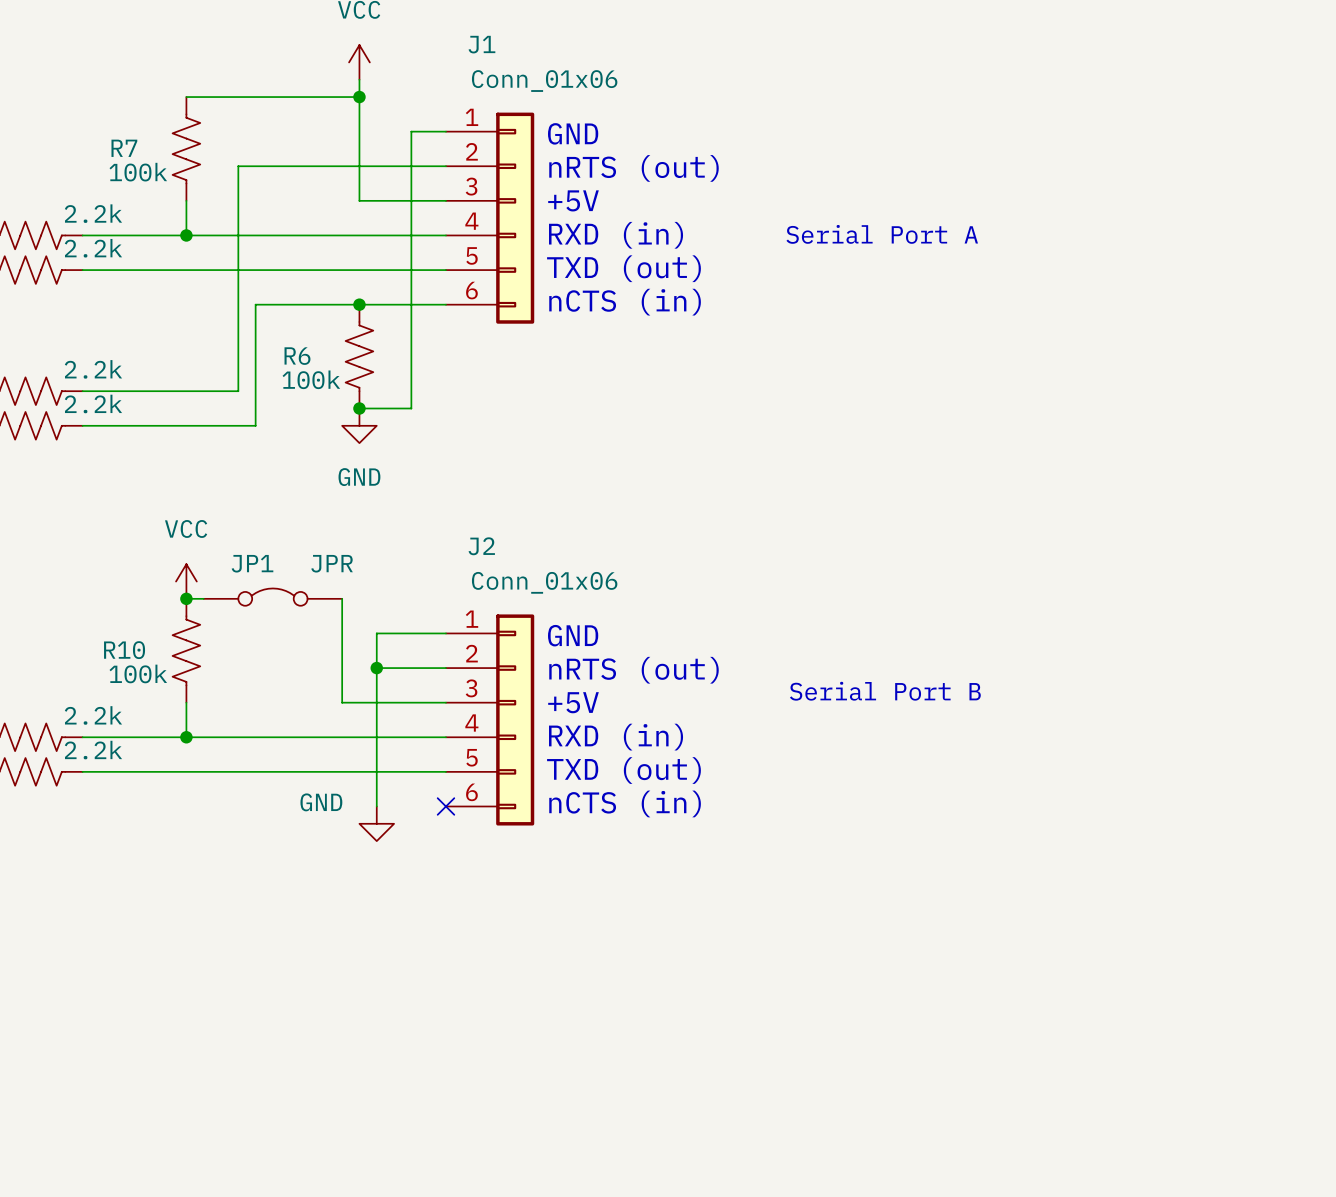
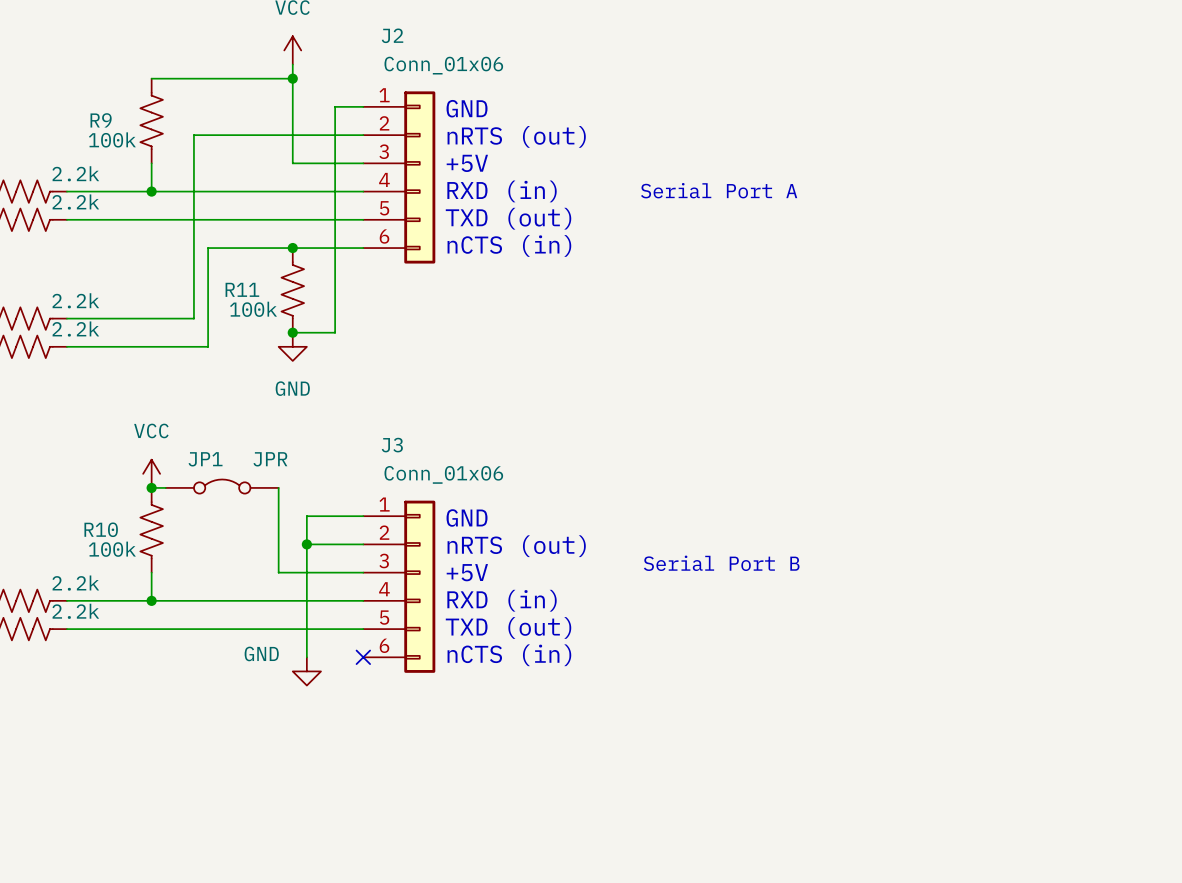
J1 name: J1 (481, 44) -> J2 (392, 35)
R7 name: R7 (124, 148) -> R9 (101, 120)
R6 name: R6 (297, 356) -> R11 (242, 289)
J2 name: J2 (481, 546) -> J3 (392, 445)

